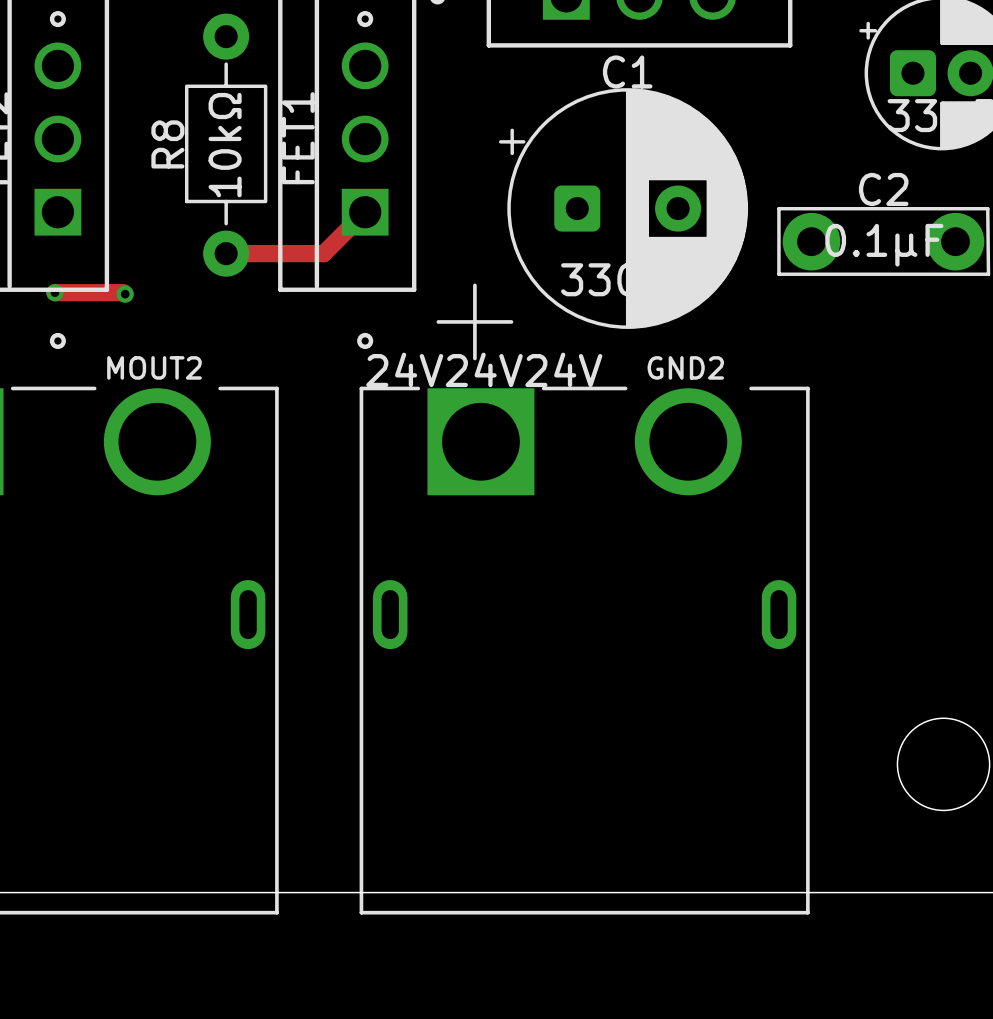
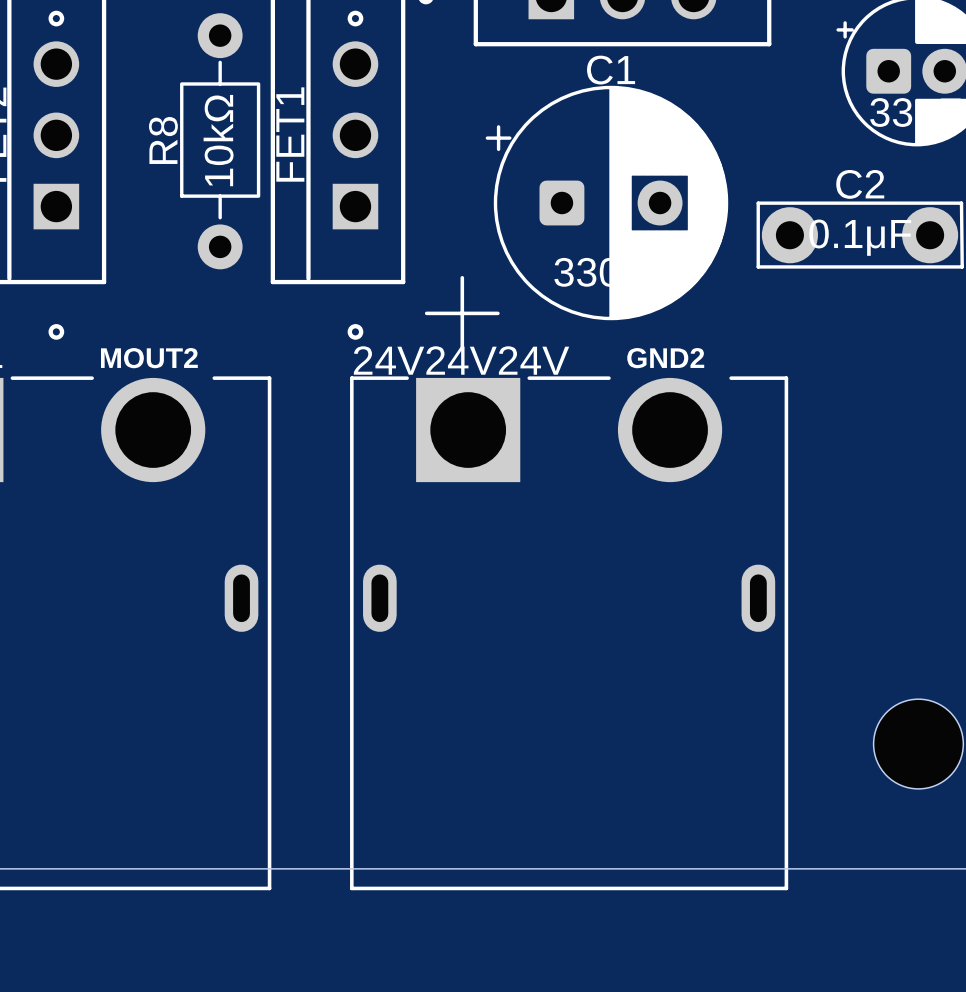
track: (365, 212) (323, 253) (226, 253) -> none
track: (54, 292) (125, 294) -> none
via: (54, 292) -> none
via: (125, 294) -> none

